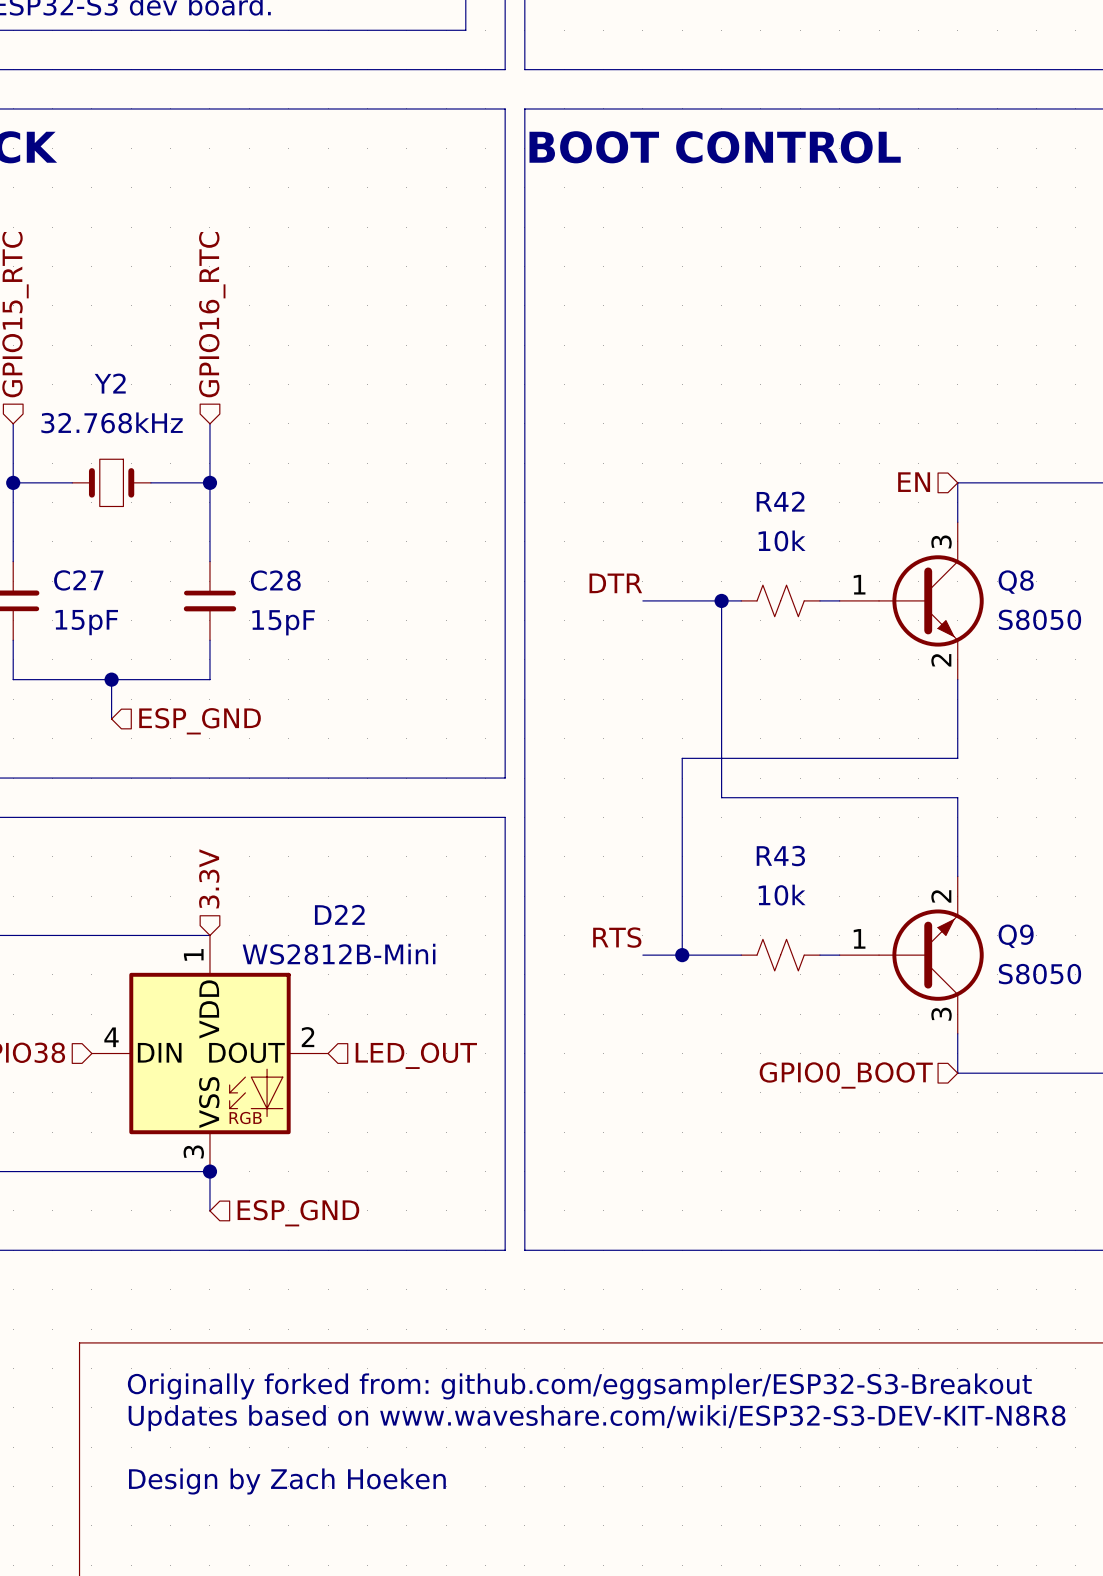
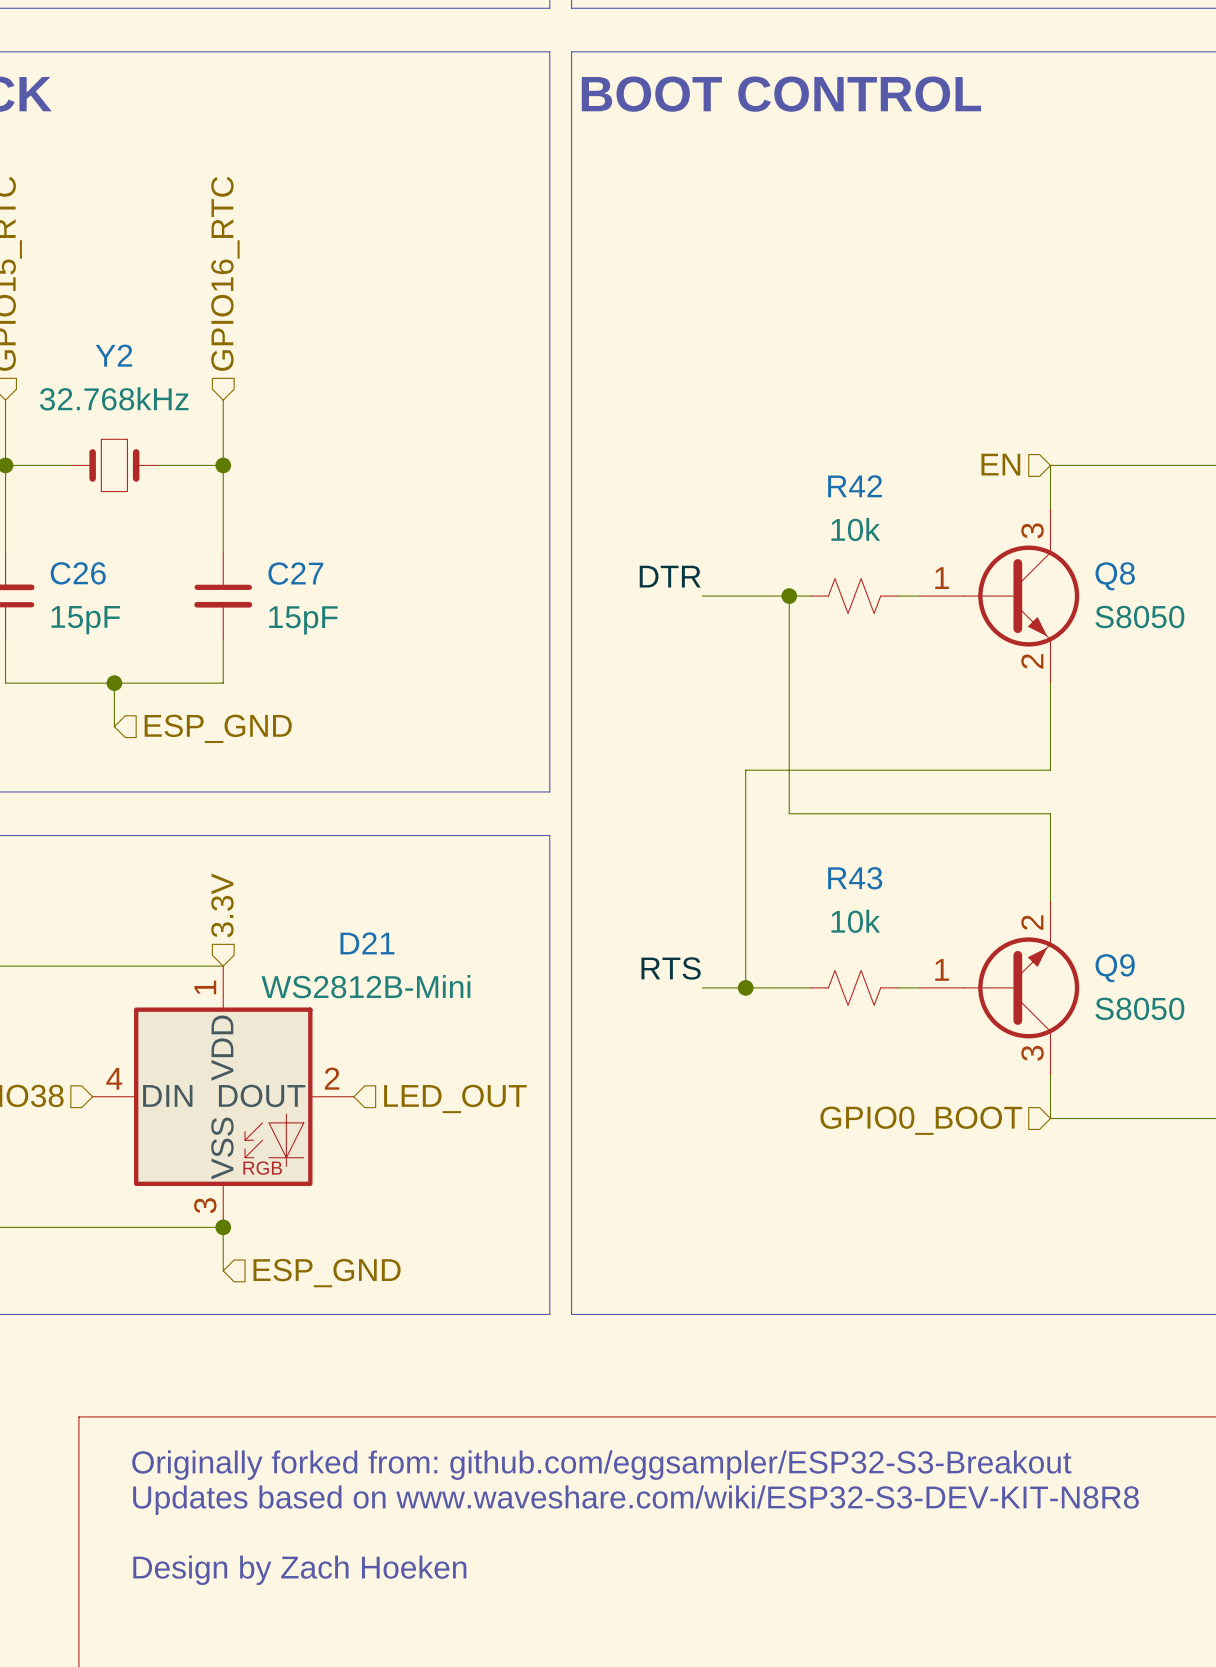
C27 name: C27 (78, 580) -> C26 (78, 573)
C28 name: C28 (275, 580) -> C27 (295, 573)
D22 name: D22 (339, 914) -> D21 (367, 943)

